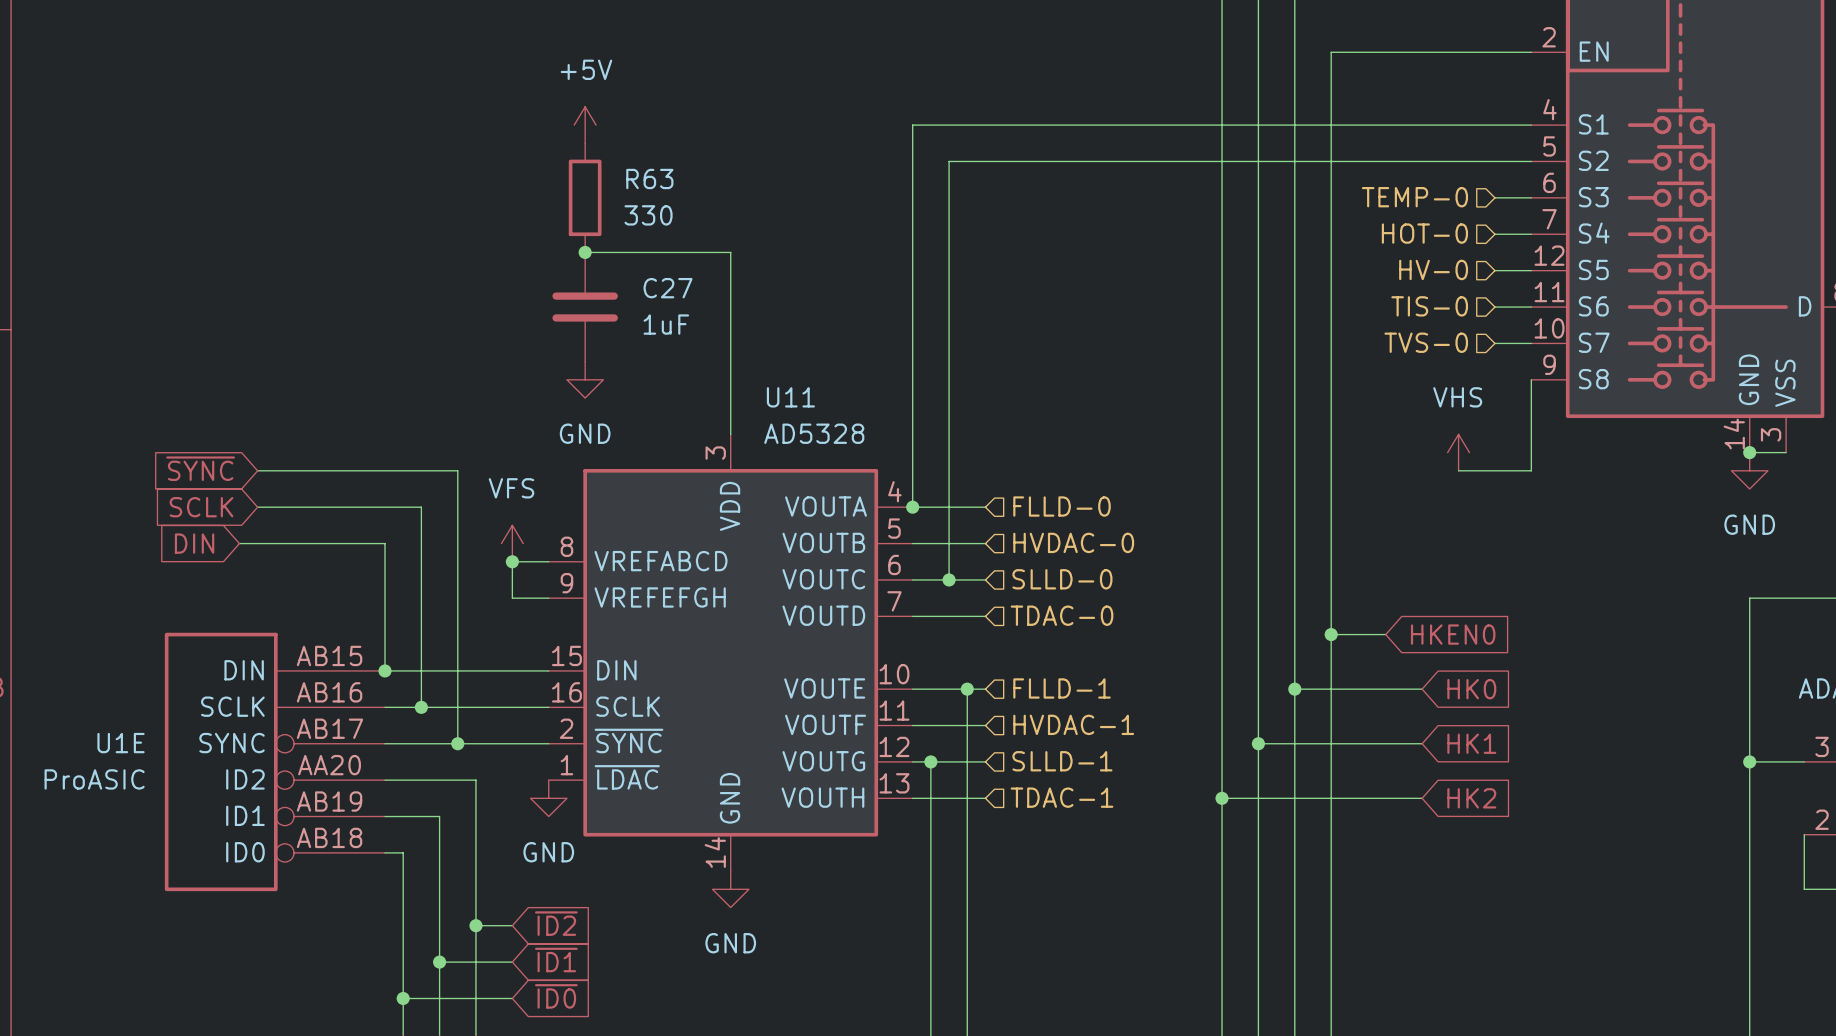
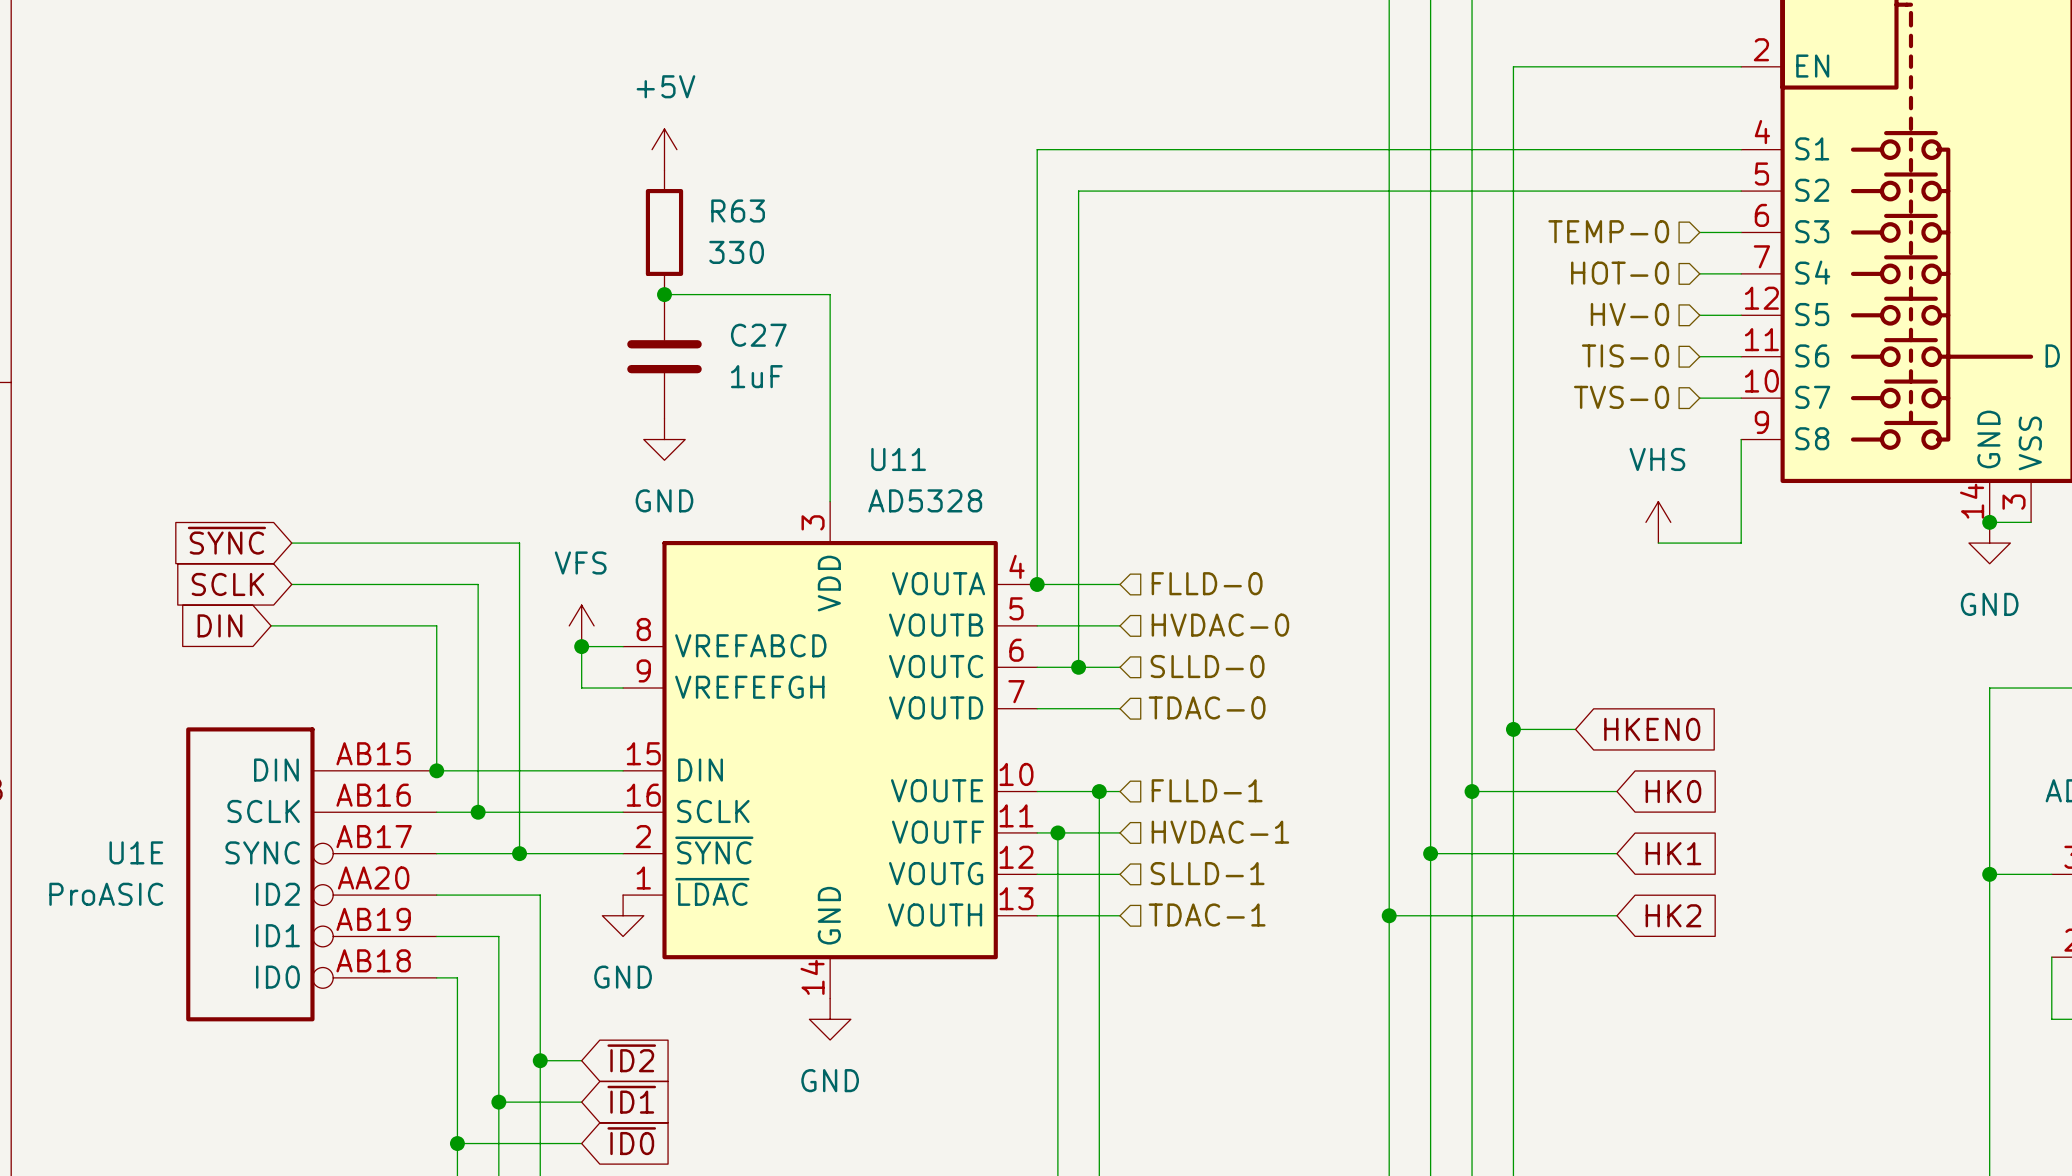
wire: none -> (1057, 832) (1057, 874)
junction position: (930, 761) -> (1057, 832)

